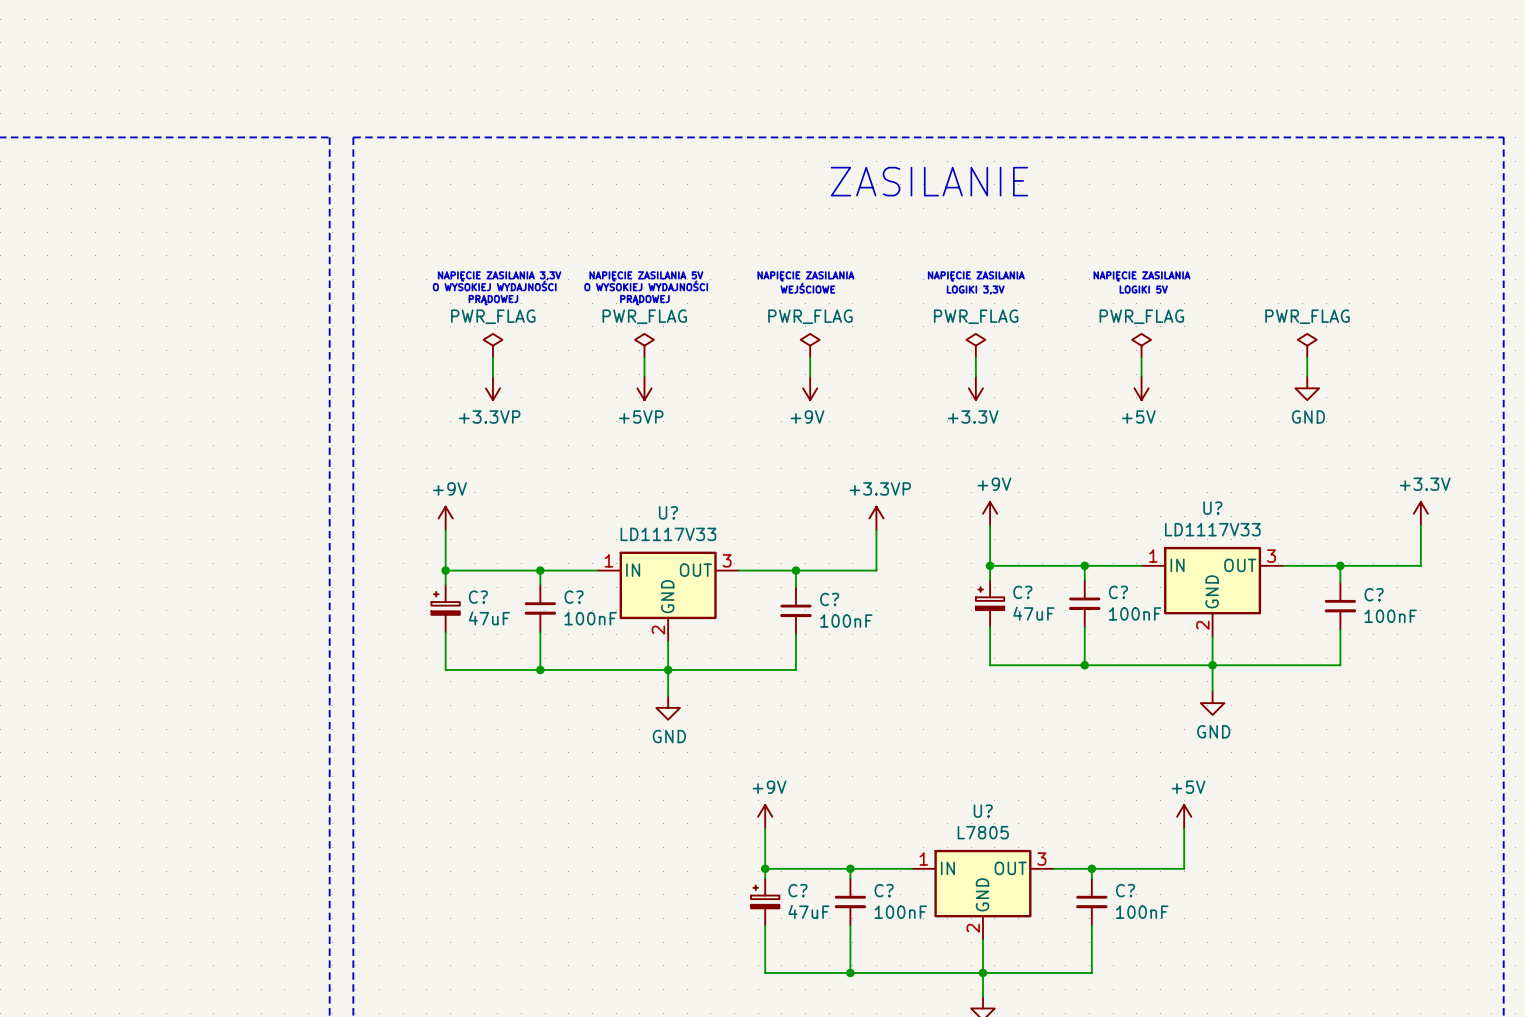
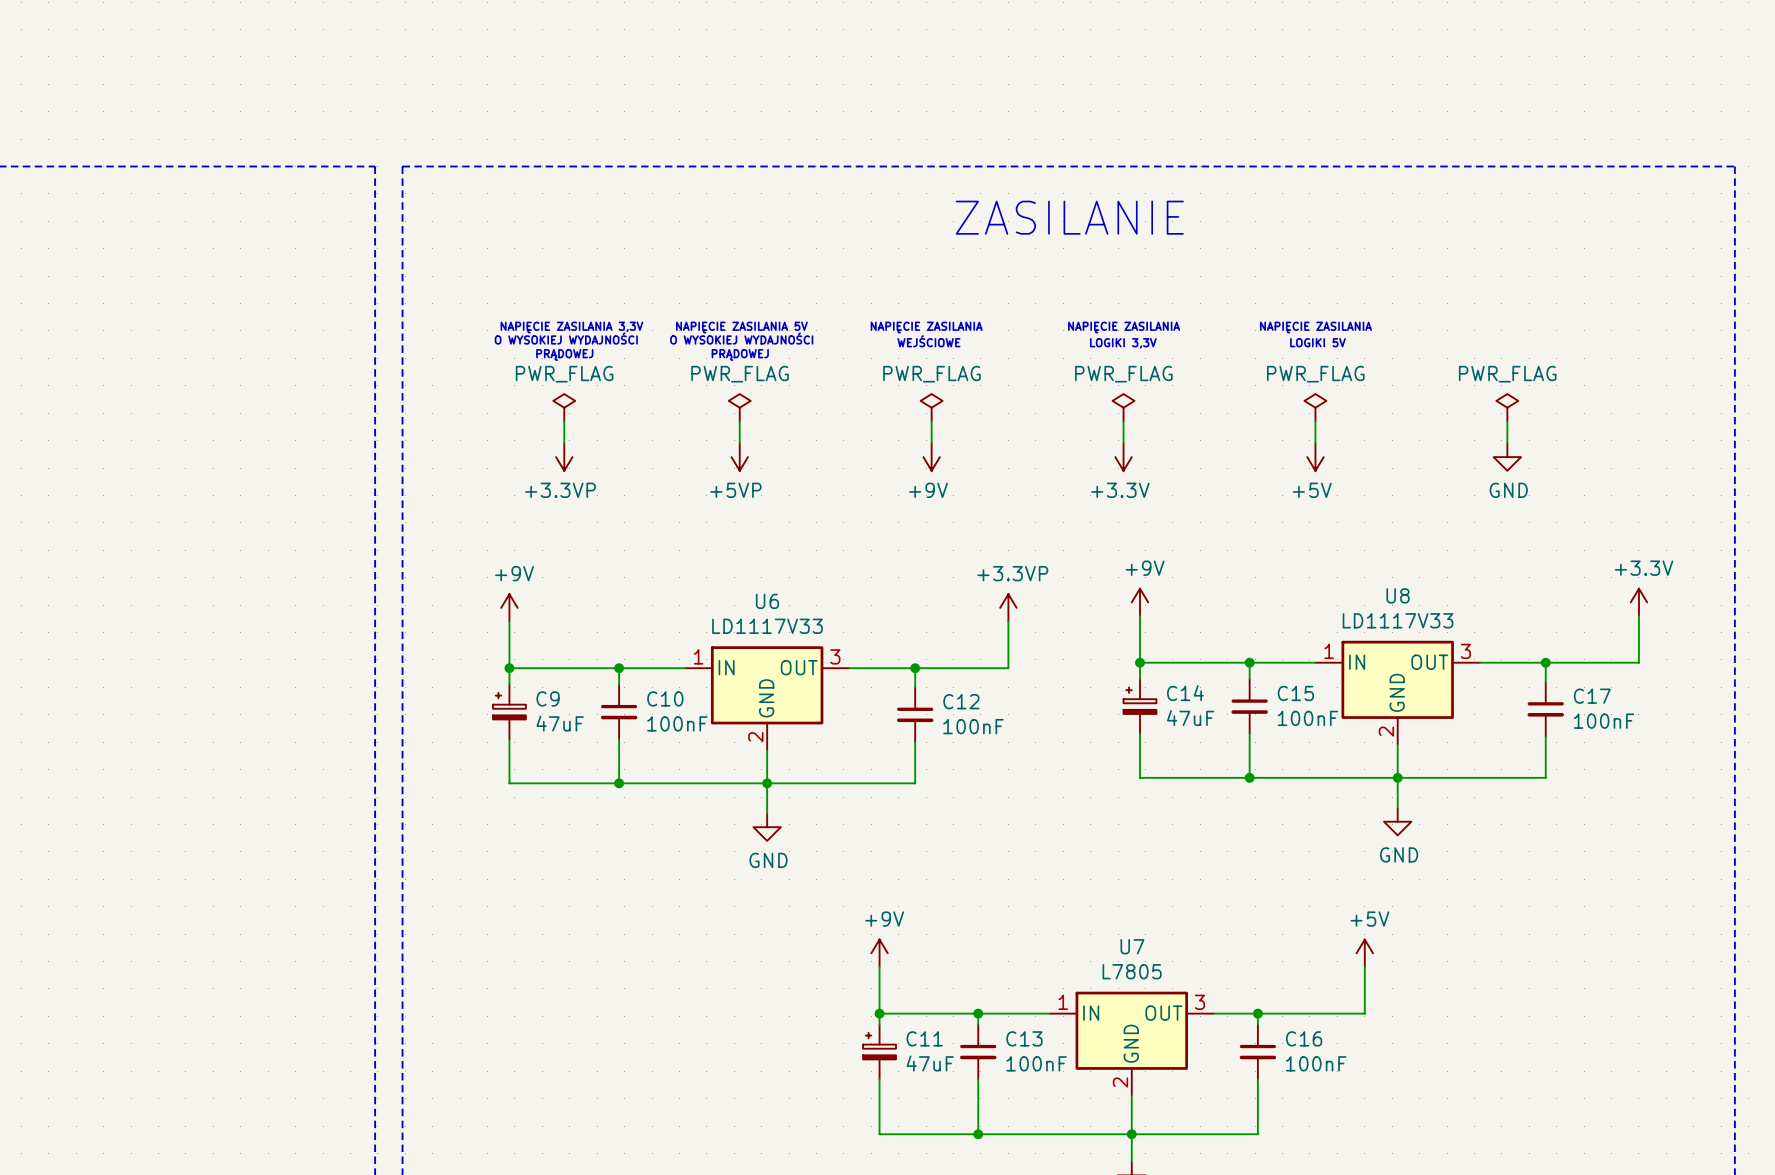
U? name: U? (1212, 508) -> U8 (1398, 595)
U? name: U? (668, 512) -> U6 (767, 601)
C? name: C? (1022, 592) -> C14 (1185, 693)
C? name: C? (1118, 592) -> C15 (1295, 693)
C? name: C? (1374, 594) -> C17 (1592, 696)
C? name: C? (478, 597) -> C9 (548, 698)
C? name: C? (574, 597) -> C10 (665, 698)
C? name: C? (829, 599) -> C12 (961, 701)
U? name: U? (983, 811) -> U7 (1132, 946)
C? name: C? (797, 890) -> C11 (924, 1038)
C? name: C? (884, 890) -> C13 (1024, 1038)
C? name: C? (1125, 890) -> C16 (1304, 1038)

